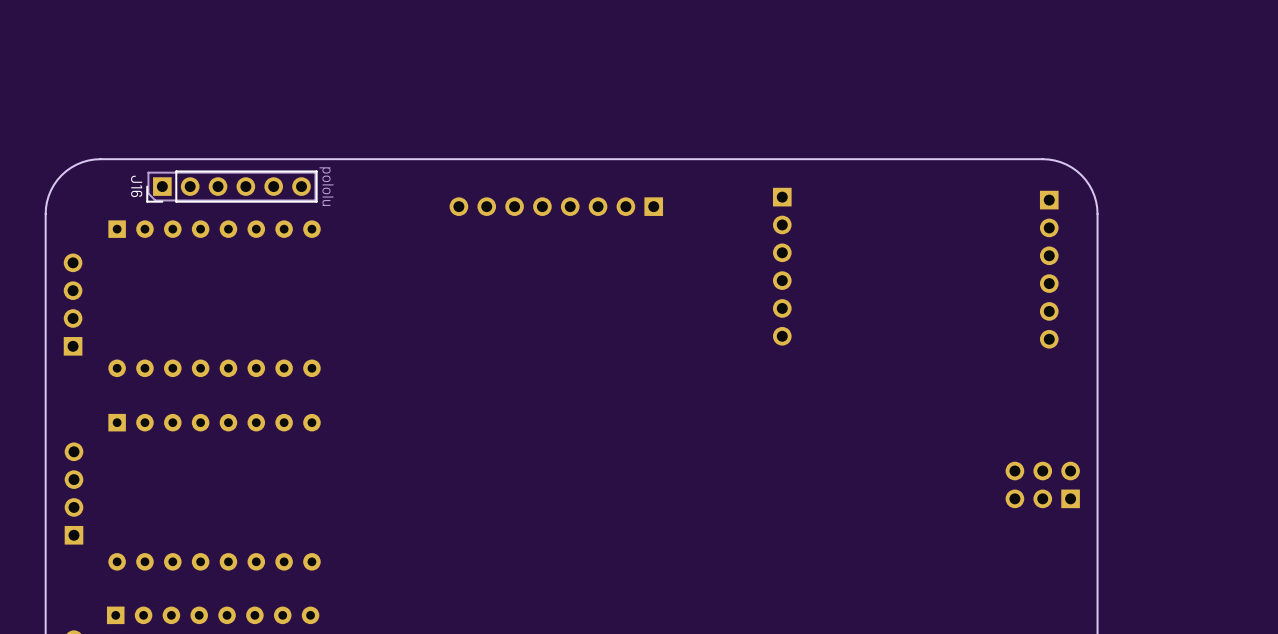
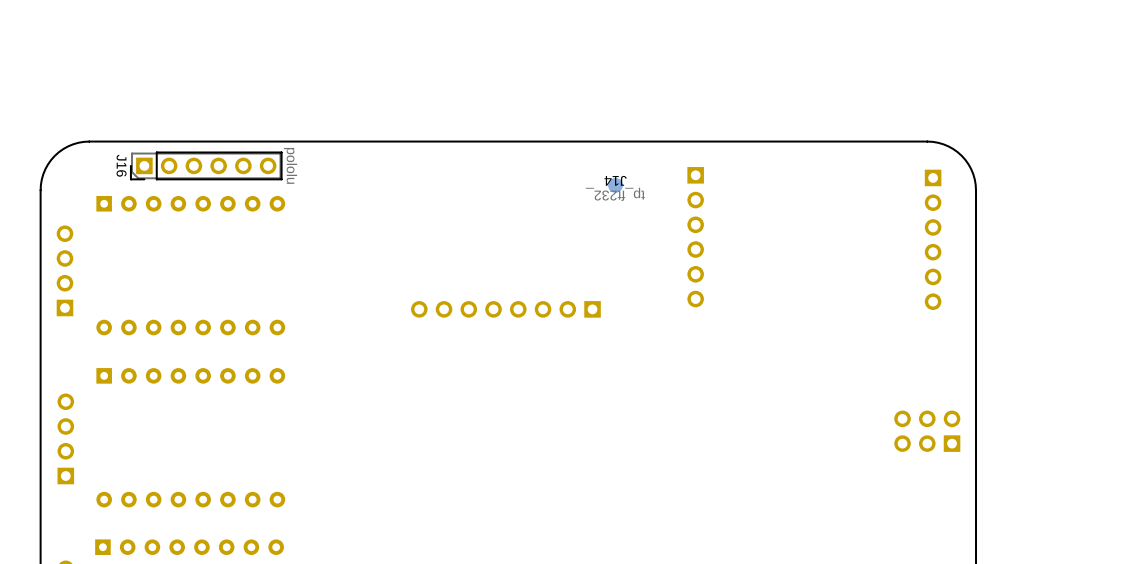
part position: (556, 206) -> (505, 309)
J14: none -> tp_ft232_ (615, 185)

